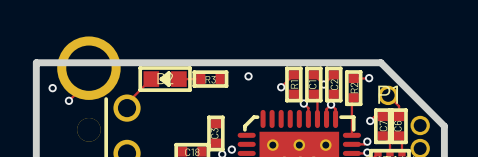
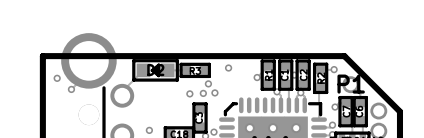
via: none -> (208, 83)
via: none -> (214, 92)
via: none -> (189, 93)
via: none -> (203, 93)
via: none -> (149, 130)

